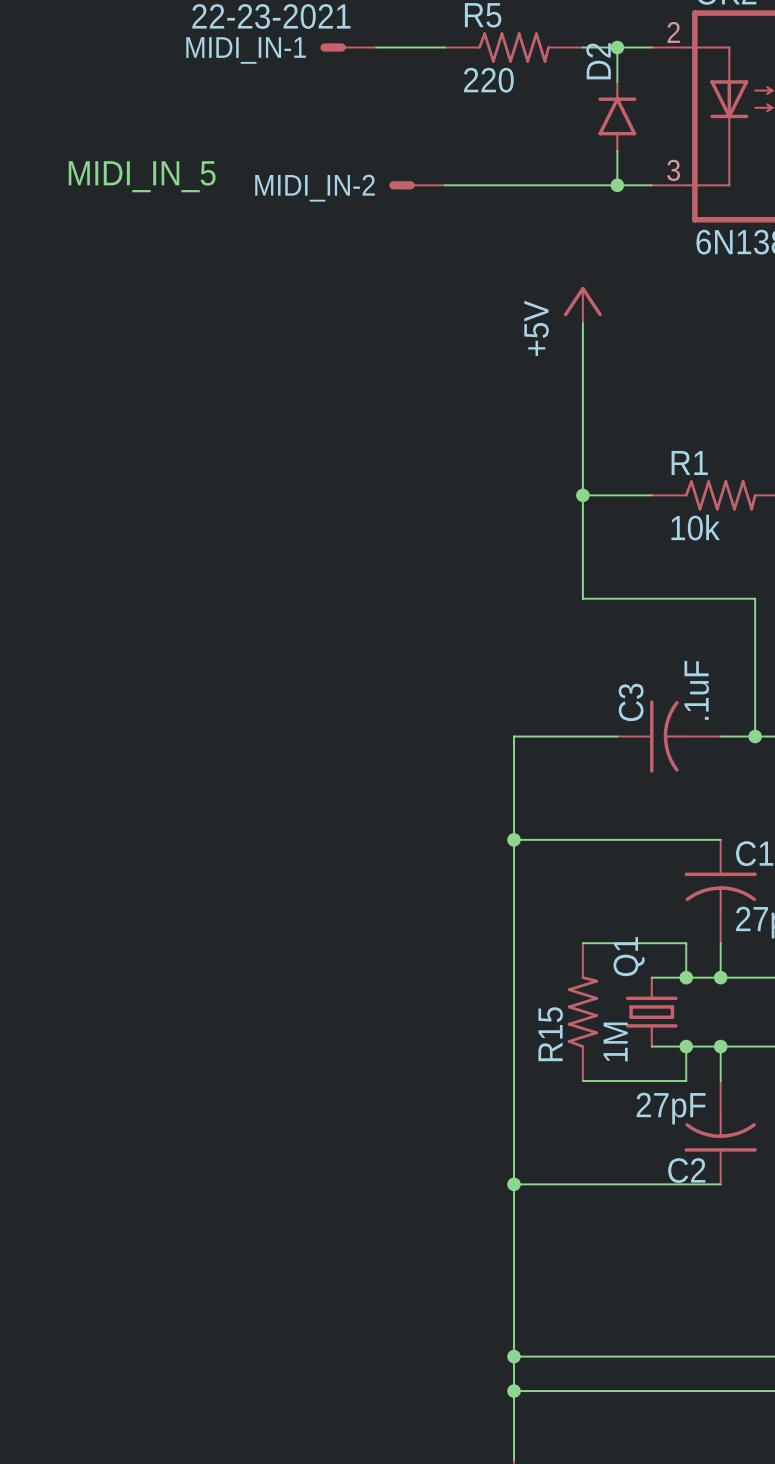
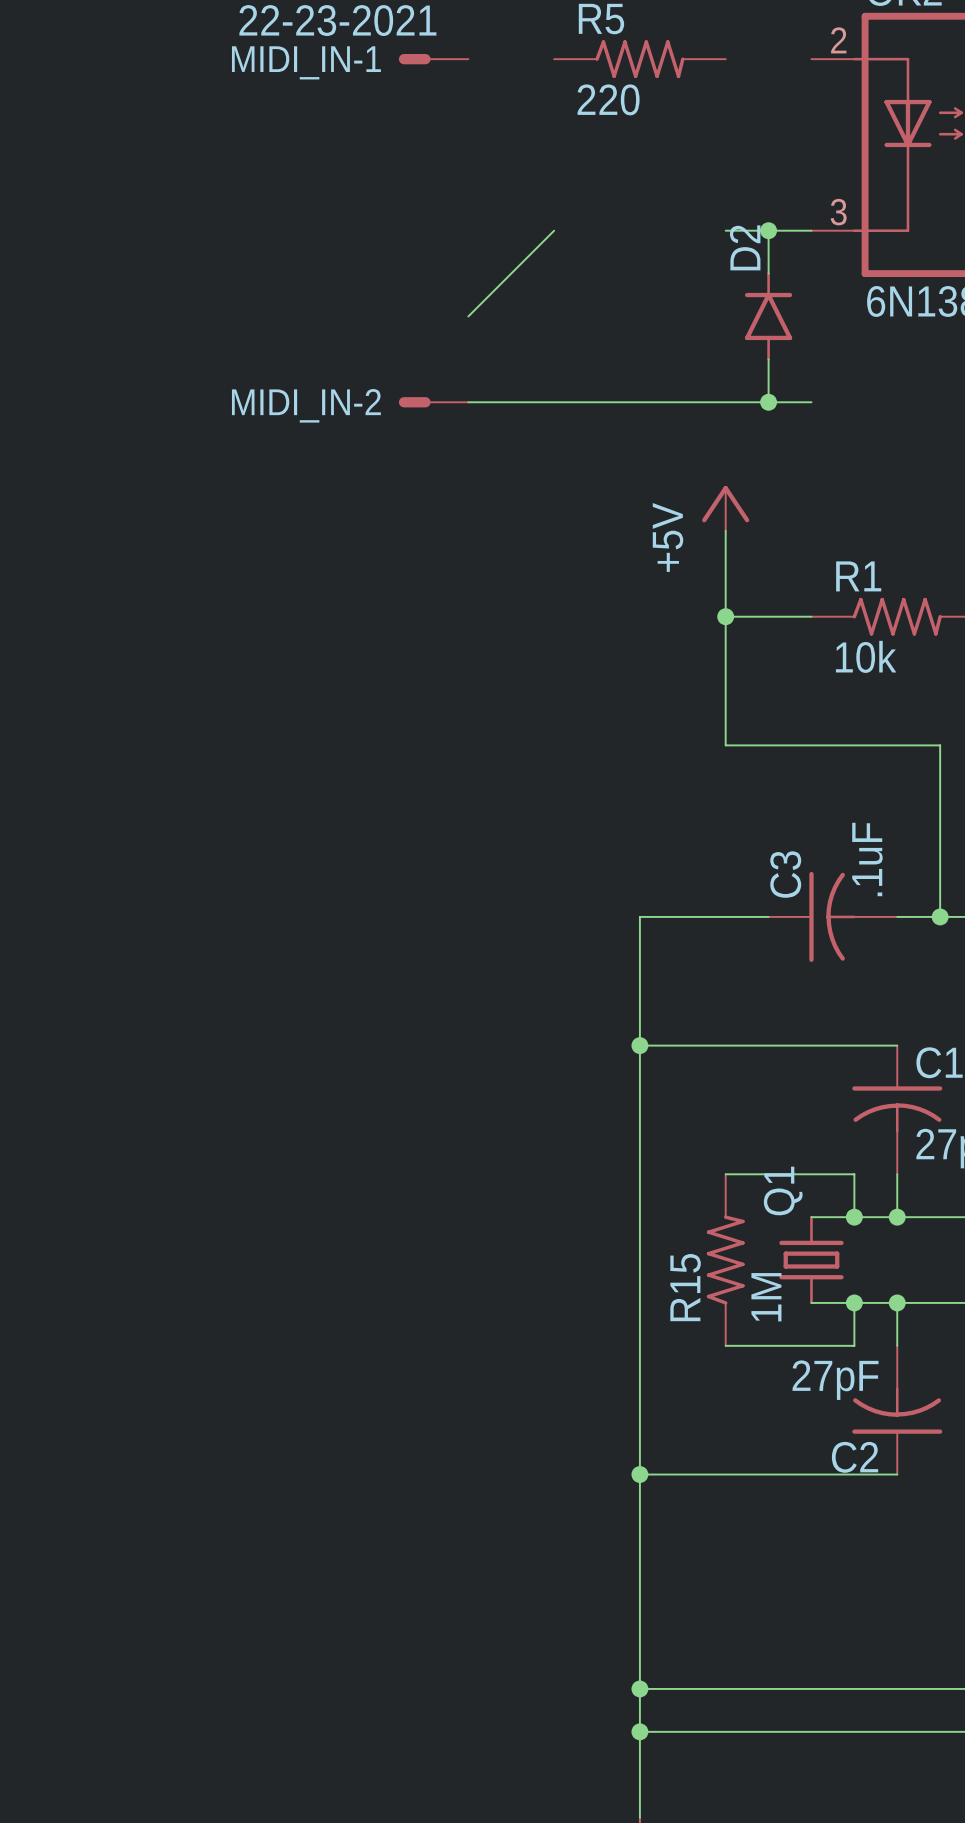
wire: (376, 47) (445, 47) -> none
wire: (582, 47) (651, 47) -> none
wire: (617, 47) (617, 81) -> (768, 359) (768, 402)
junction: (617, 47) -> none
D2 position: (617, 116) -> (768, 316)
wire: (617, 150) (617, 185) -> (768, 273) (768, 230)
text: MIDI_IN_5 (142, 176) -> none
MIDI_IN-2 position: (417, 185) -> (433, 402)
wire: (445, 185) (582, 185) -> (554, 230) (468, 316)
power symbol position: +5V (582, 305) -> +5V (725, 508)
wire: none -> (468, 402) (811, 402)
wire: (582, 323) (582, 426) -> none
junction: none -> (768, 402)

